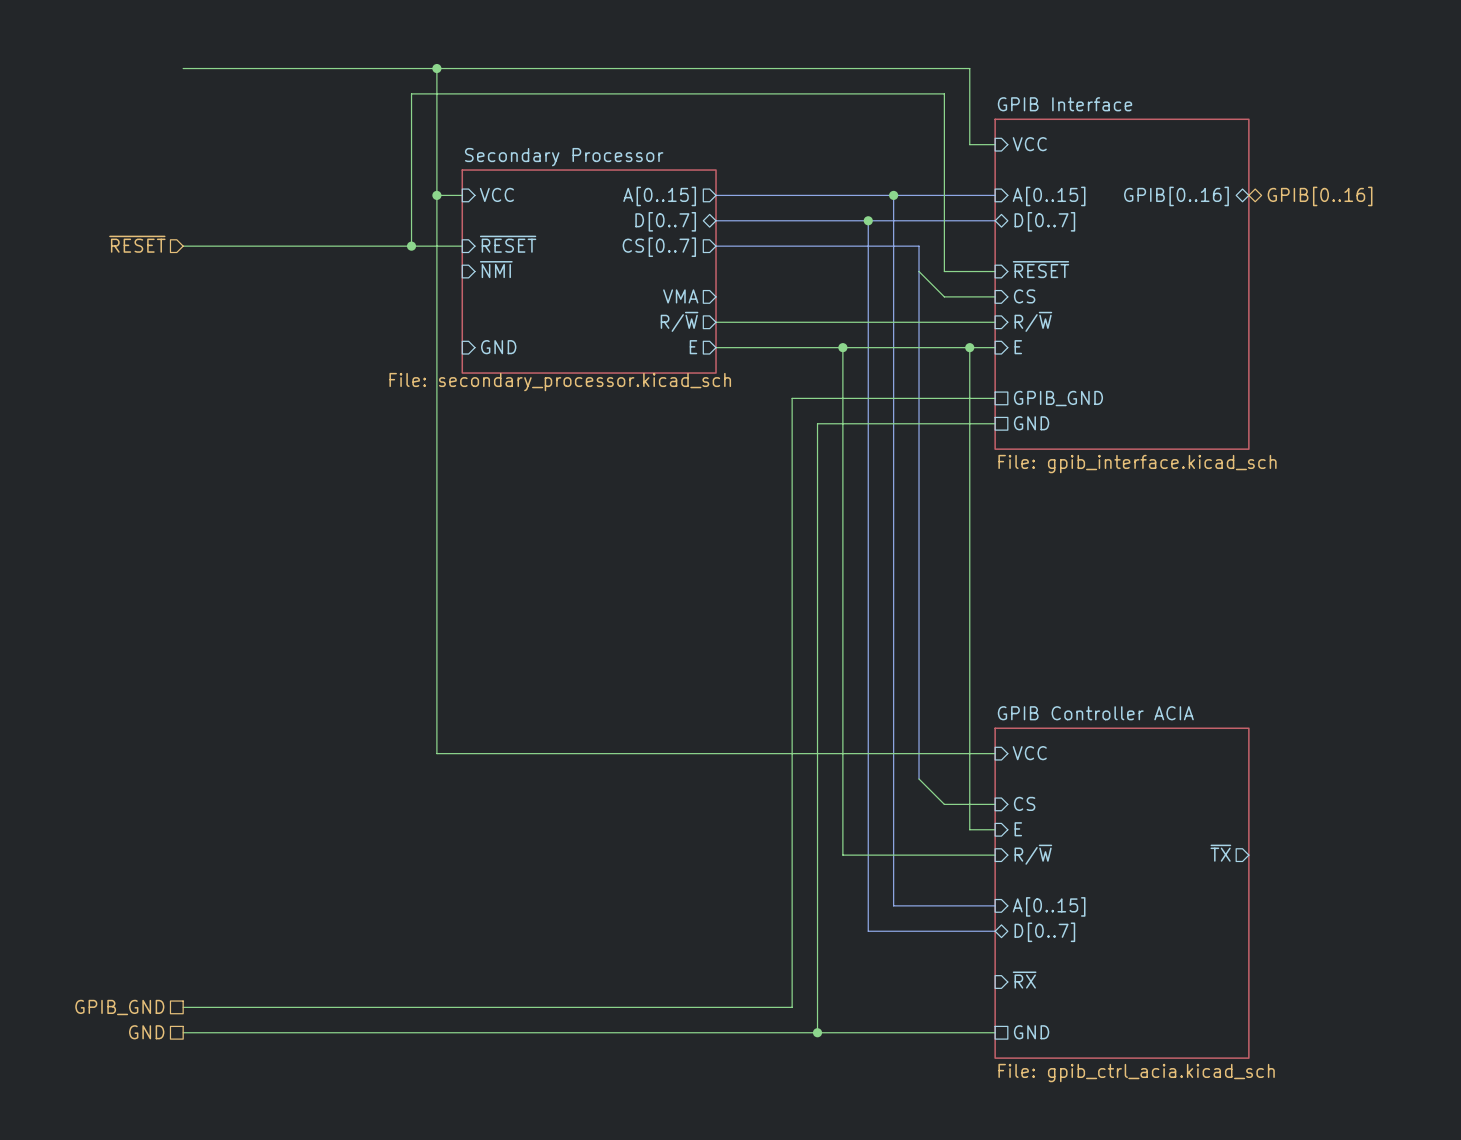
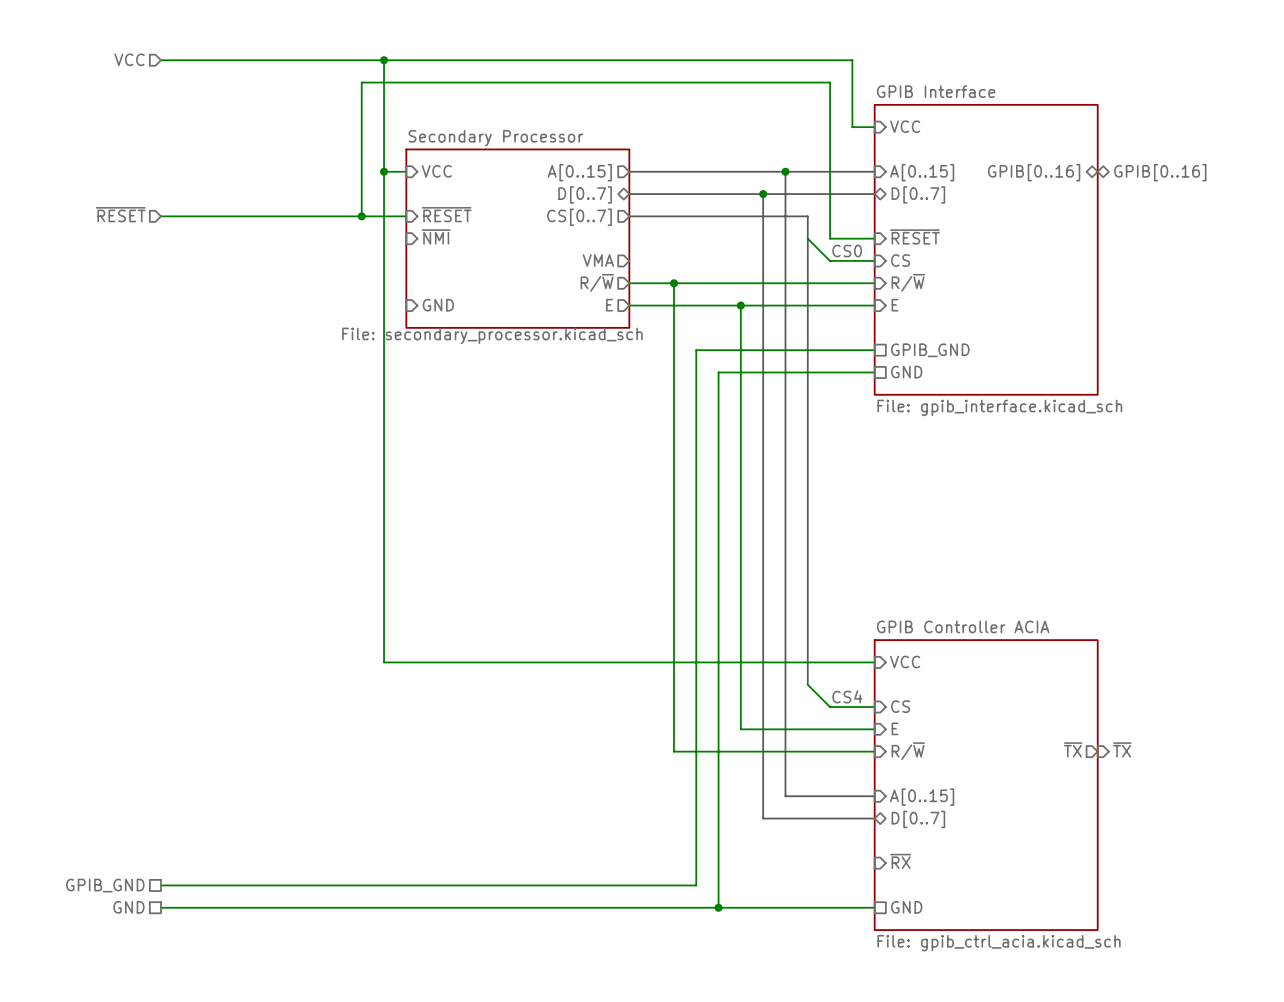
hierarchical label: none -> VCC (129, 59)
label: none -> CS0 (847, 251)
wire: none -> (673, 283) (673, 751) (740, 751)
junction: none -> (673, 283)
wire: (969, 347) (969, 829) -> none
junction: (969, 347) -> none
label: none -> CS4 (847, 696)
wire: (842, 829) (842, 855) -> (740, 729) (852, 729)
hierarchical label: none -> ~{TX} (1122, 749)

